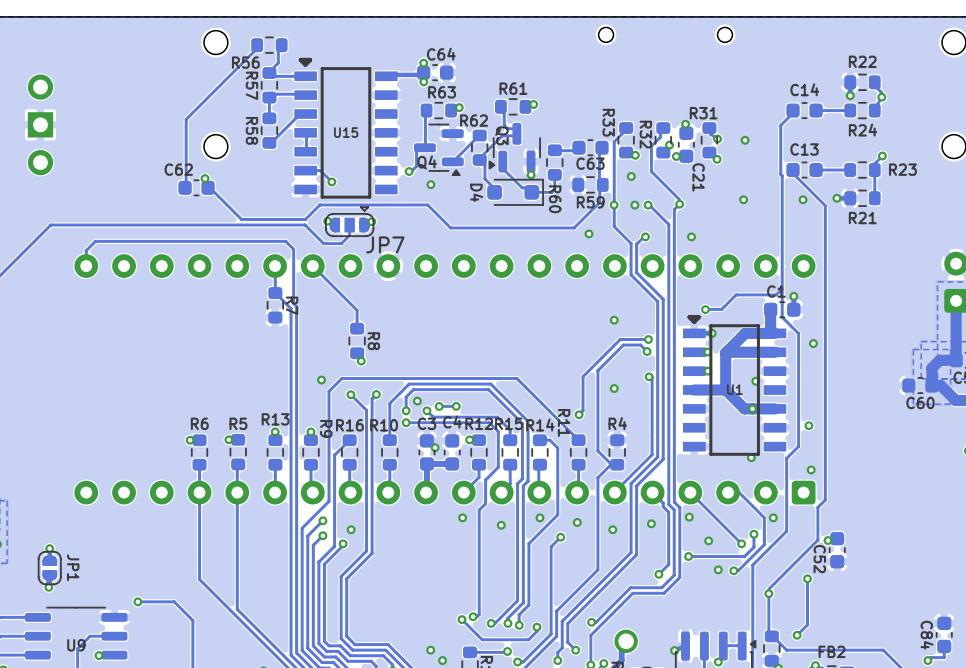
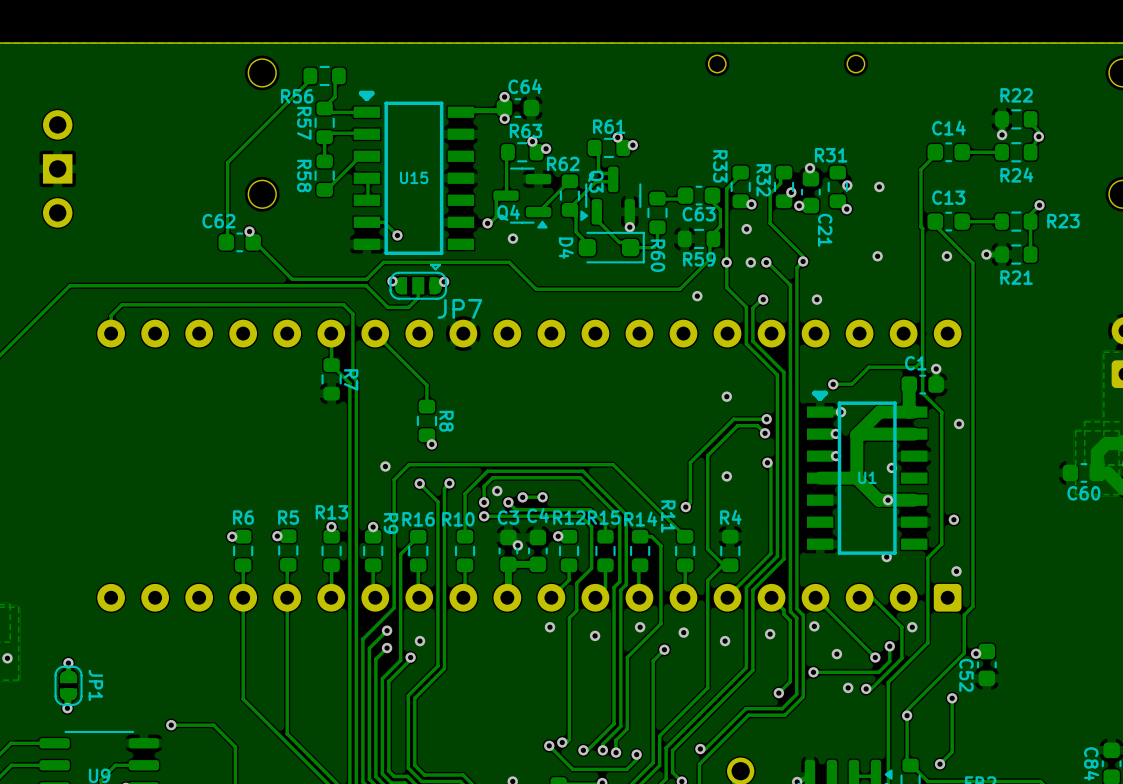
via: none -> (617, 137)
via: none -> (532, 141)
track: (710, 132) (717, 139) -> none
track: (599, 153) (599, 178) -> none
track: none -> (712, 202) (720, 209) (720, 226) (714, 232)

